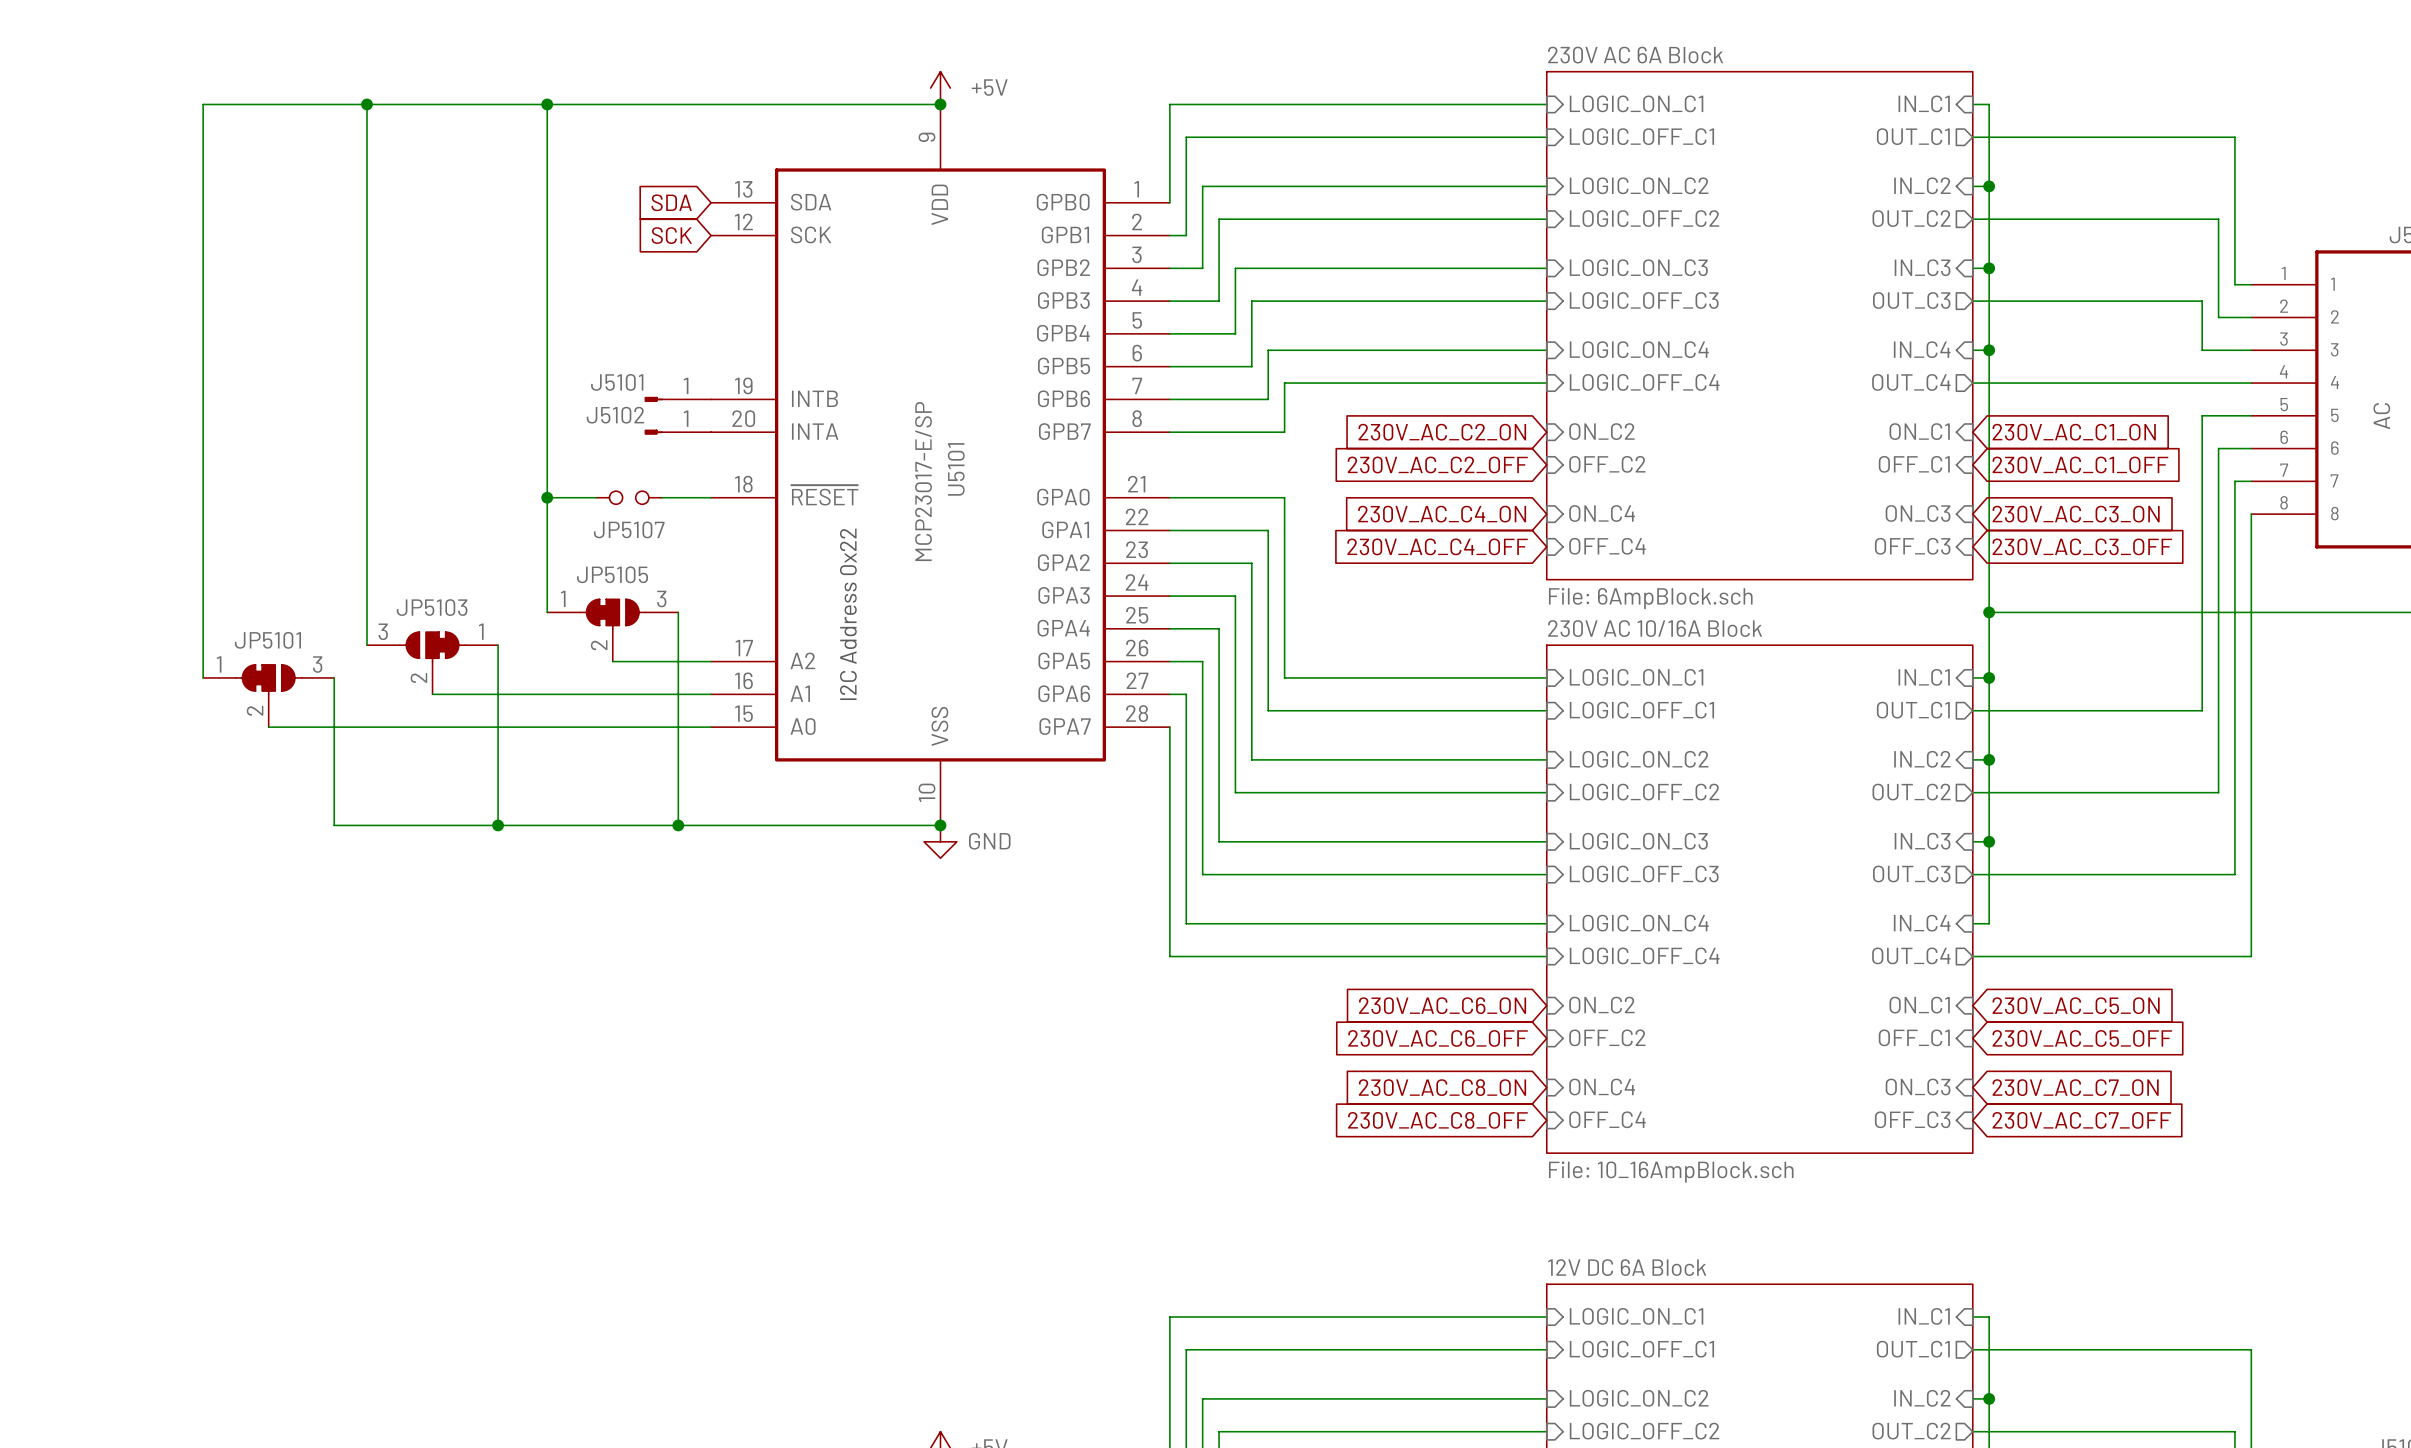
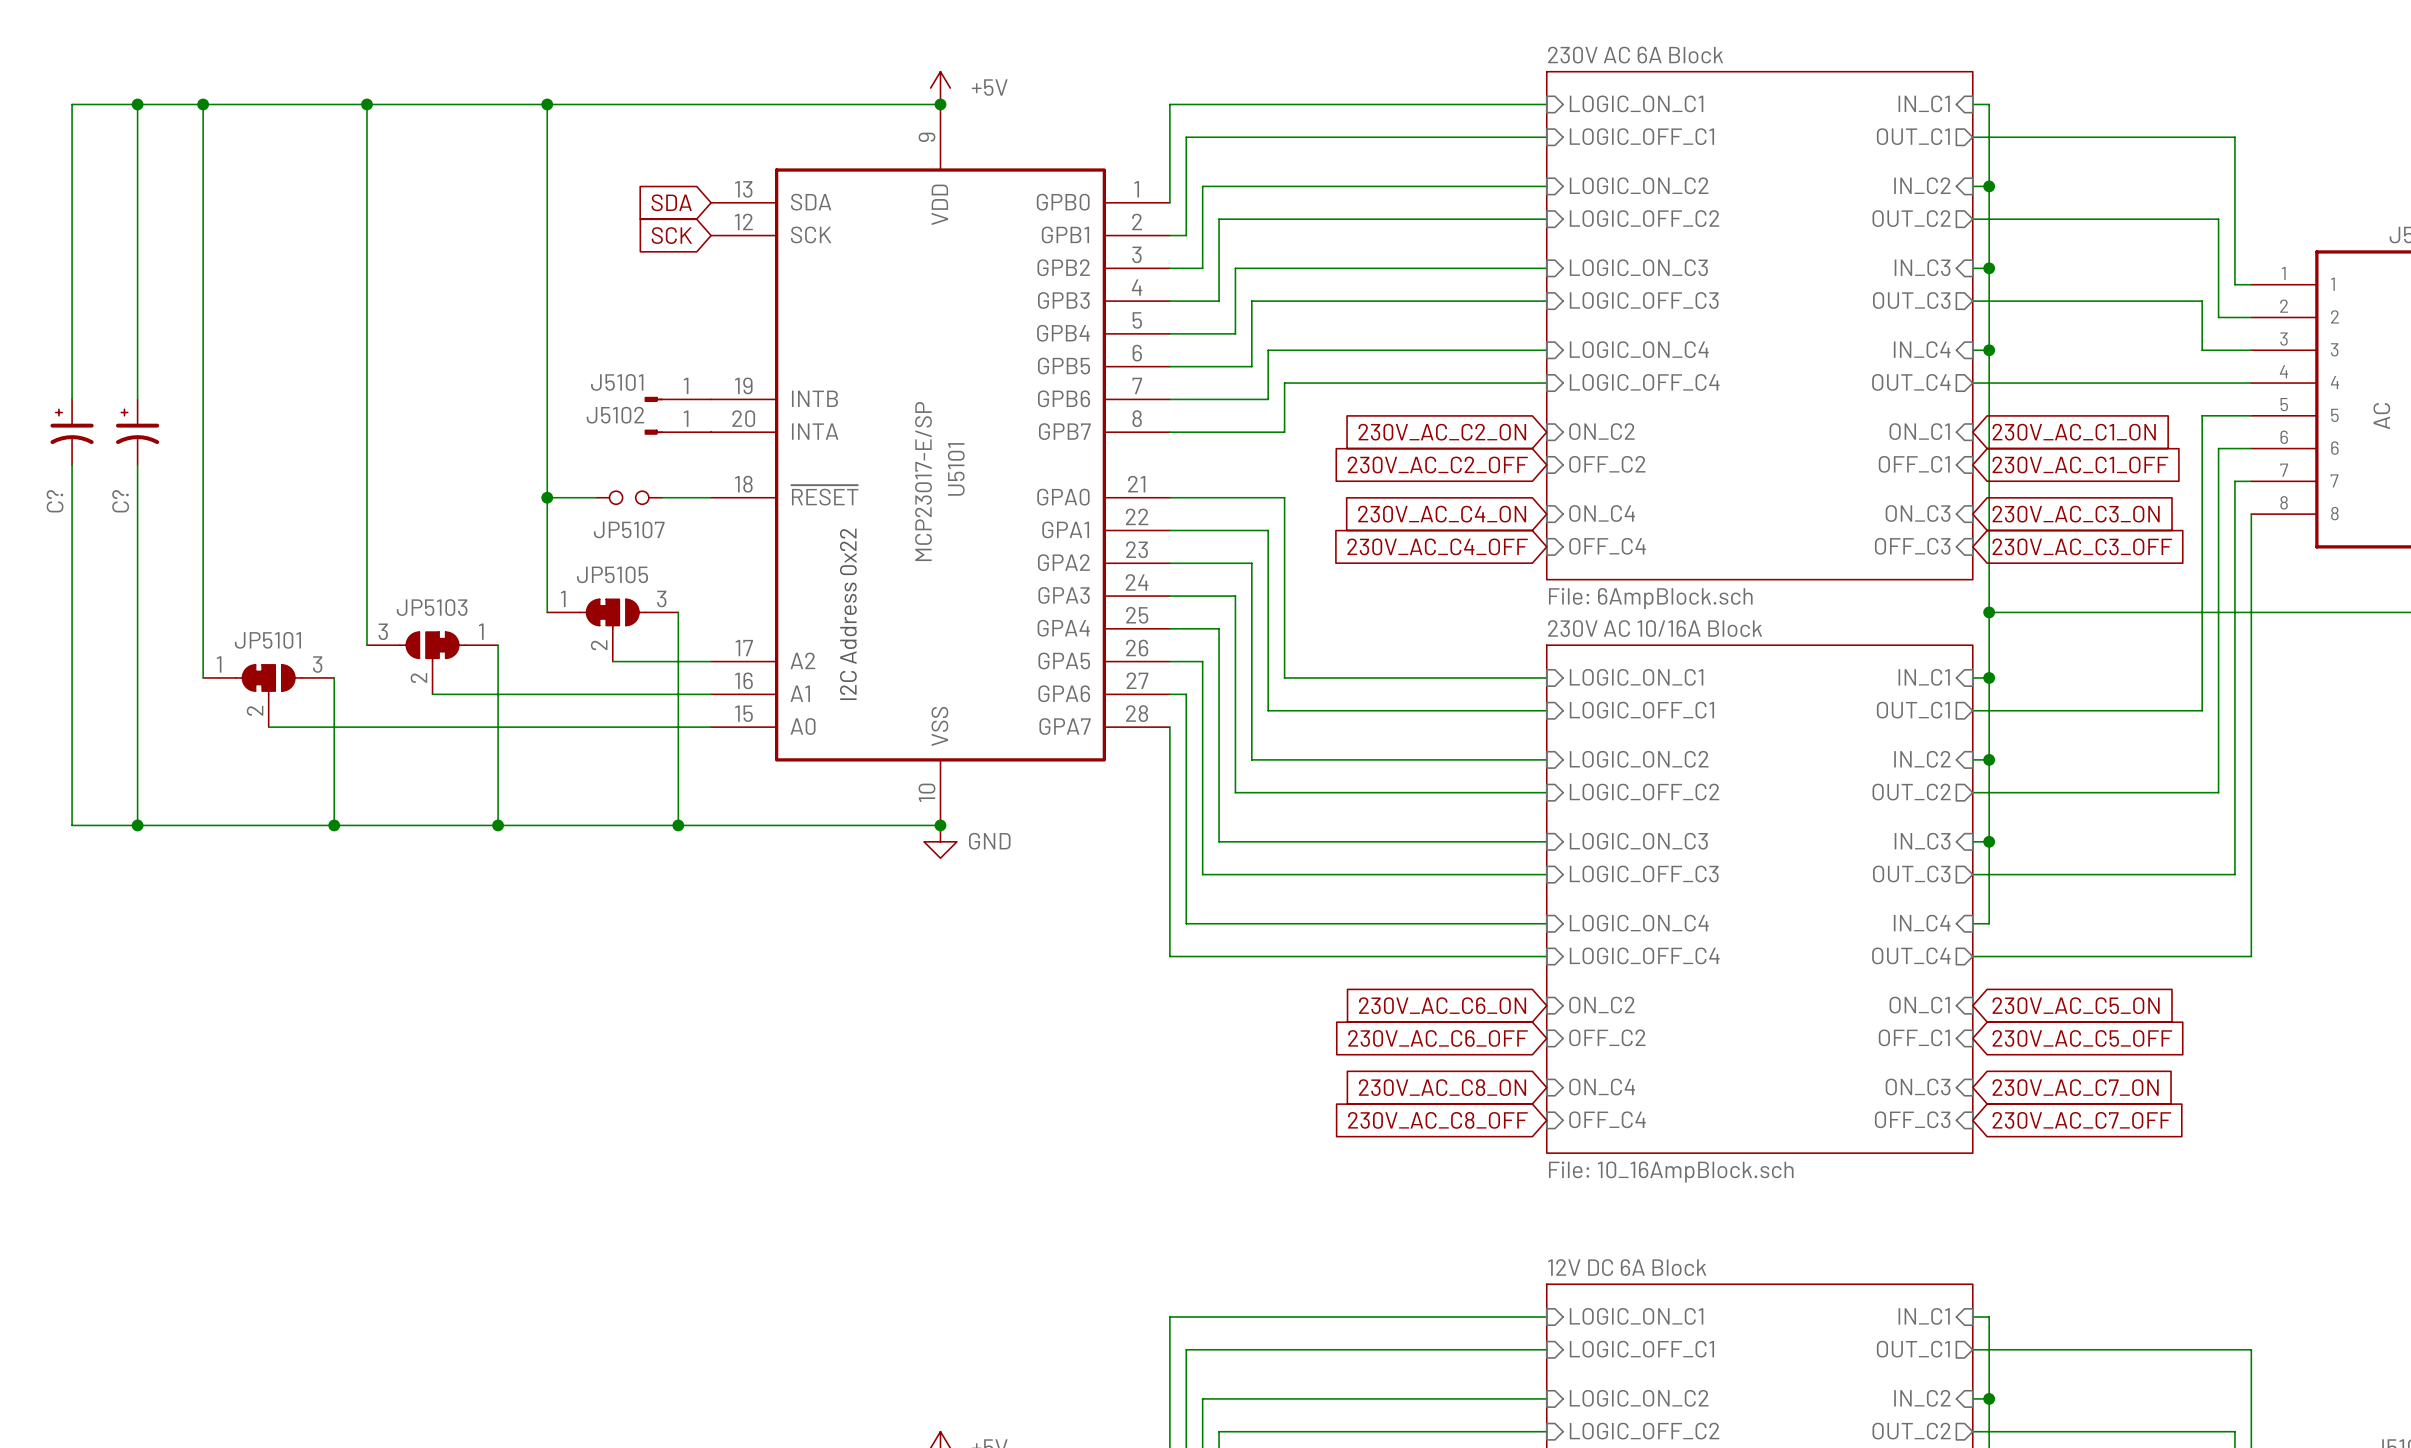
wire: none -> (137, 104) (137, 399)
junction: none -> (137, 104)
wire: none -> (203, 104) (72, 104) (72, 399)
junction: none -> (203, 104)
C?: none -> (72, 432)
C?: none -> (137, 432)
wire: none -> (72, 464) (72, 825) (334, 825)
wire: none -> (137, 464) (137, 825)
junction: none -> (137, 825)
junction: none -> (334, 825)

